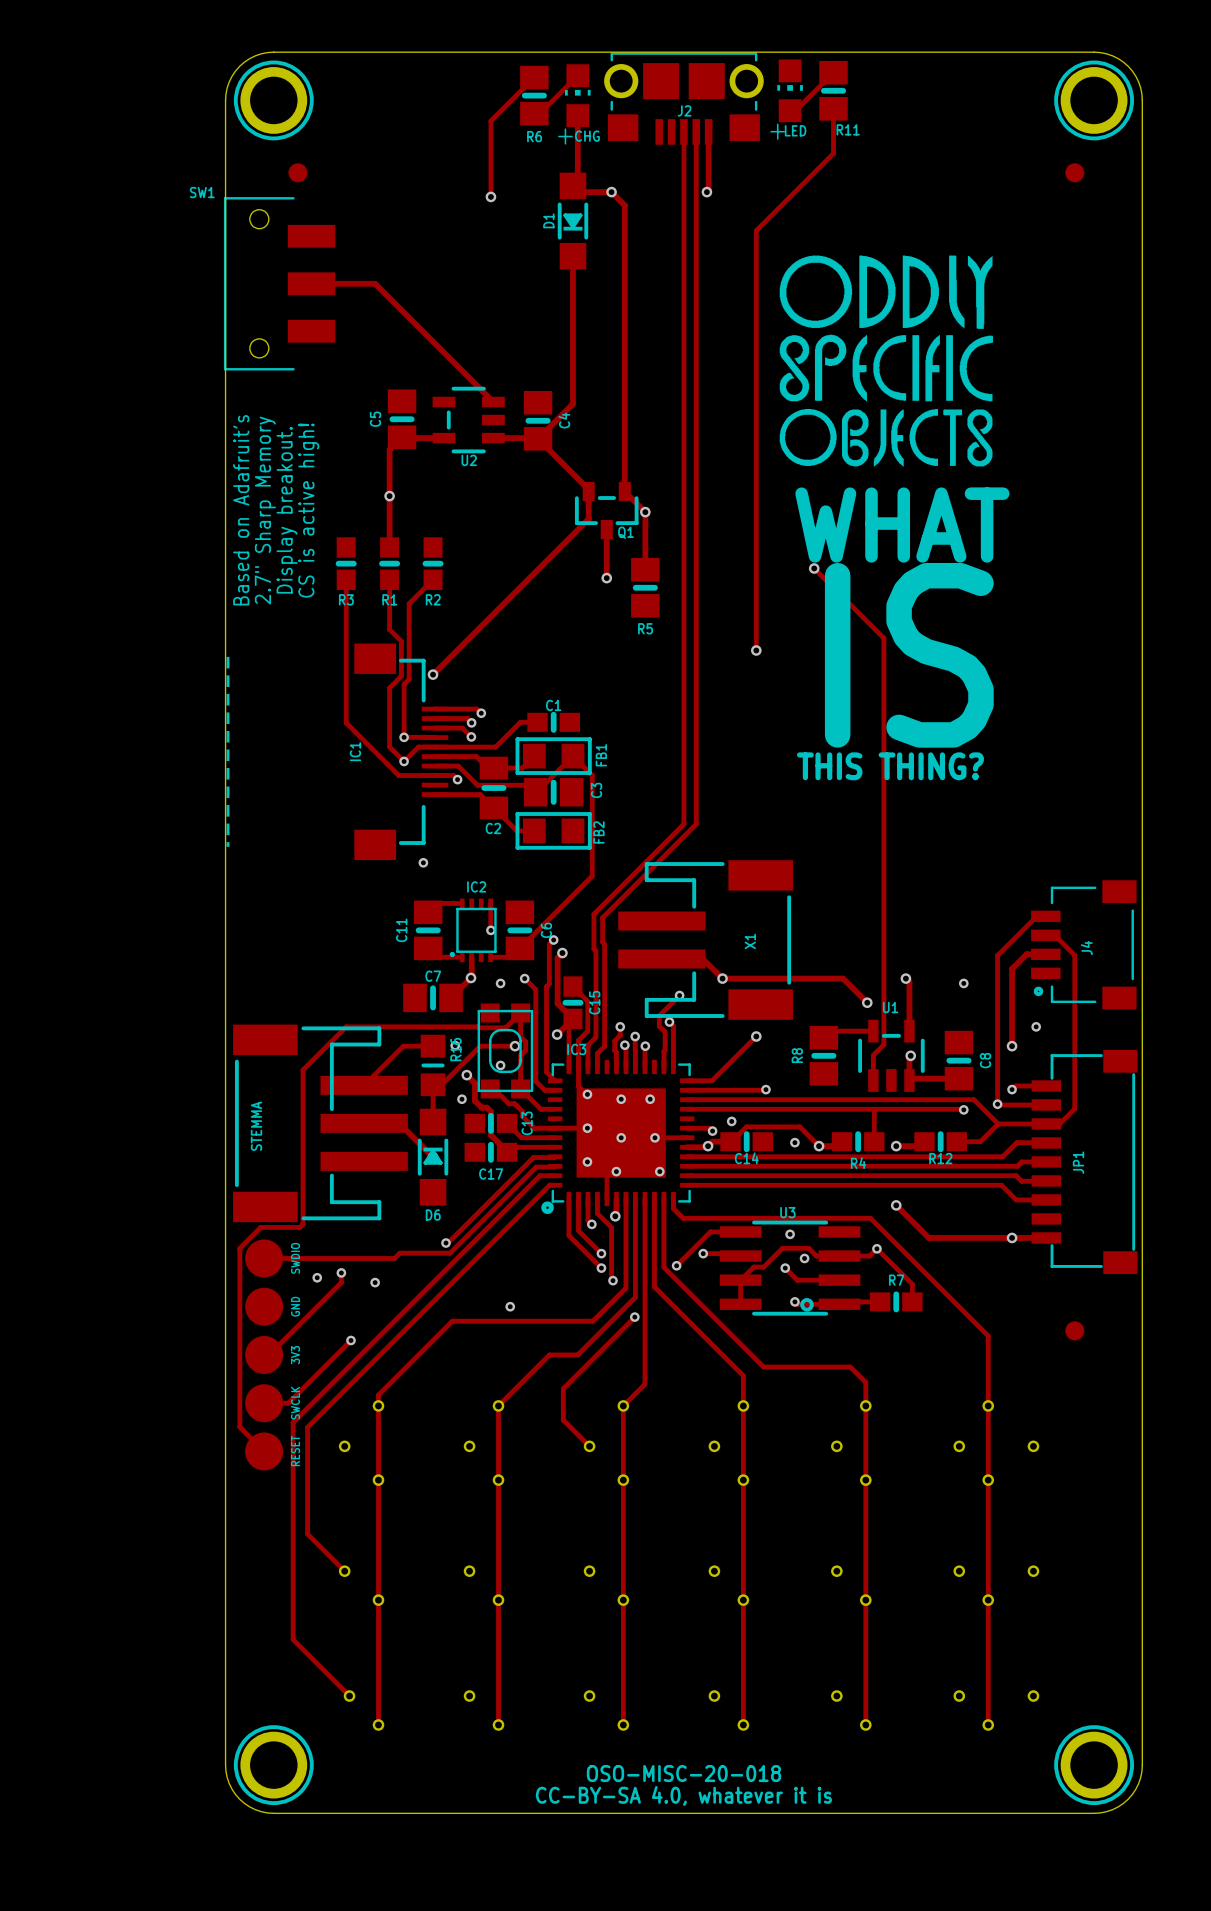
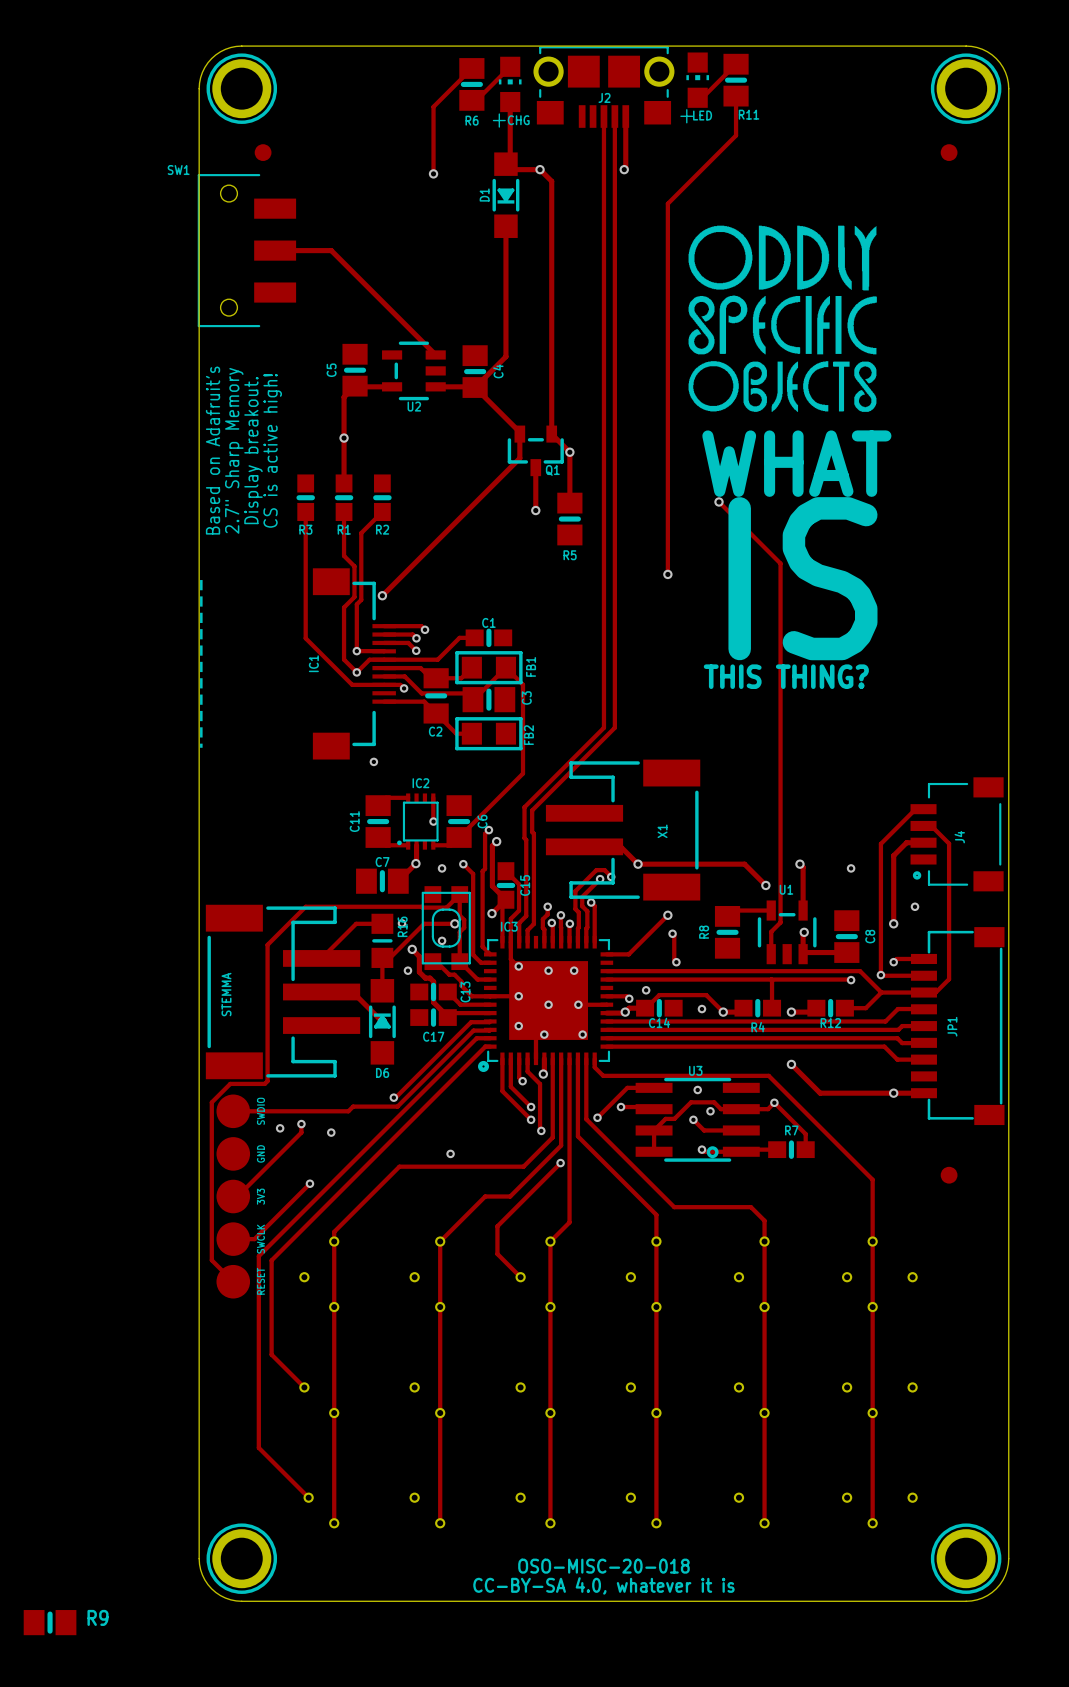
track: none -> (611, 876) (604, 870) (596, 870) (575, 891) (575, 909) (578, 912) (577, 942)
via: none -> (611, 876)
via: none -> (672, 933)
track: (765, 1089) (687, 1090) -> (676, 962) (674, 960) (674, 935) (672, 933)
R9: none -> (50, 1622)

